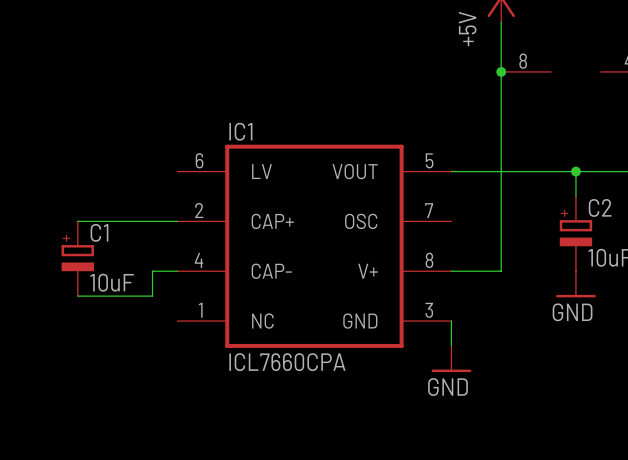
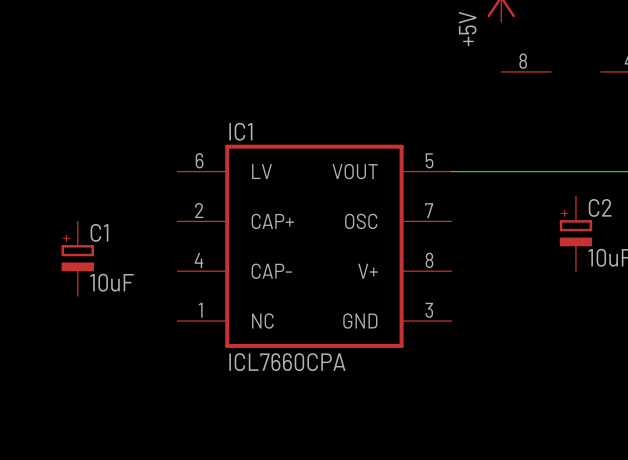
wire: (501, 22) (501, 271) (451, 271) -> none
junction: (501, 71) -> none
wire: (575, 171) (575, 196) -> none
junction: (575, 171) -> none
wire: (77, 221) (177, 221) -> none
wire: (177, 271) (152, 271) (152, 296) (77, 296) -> none
power symbol: GND (575, 284) -> none
wire: (451, 321) (451, 345) -> none
power symbol: GND (451, 359) -> none

